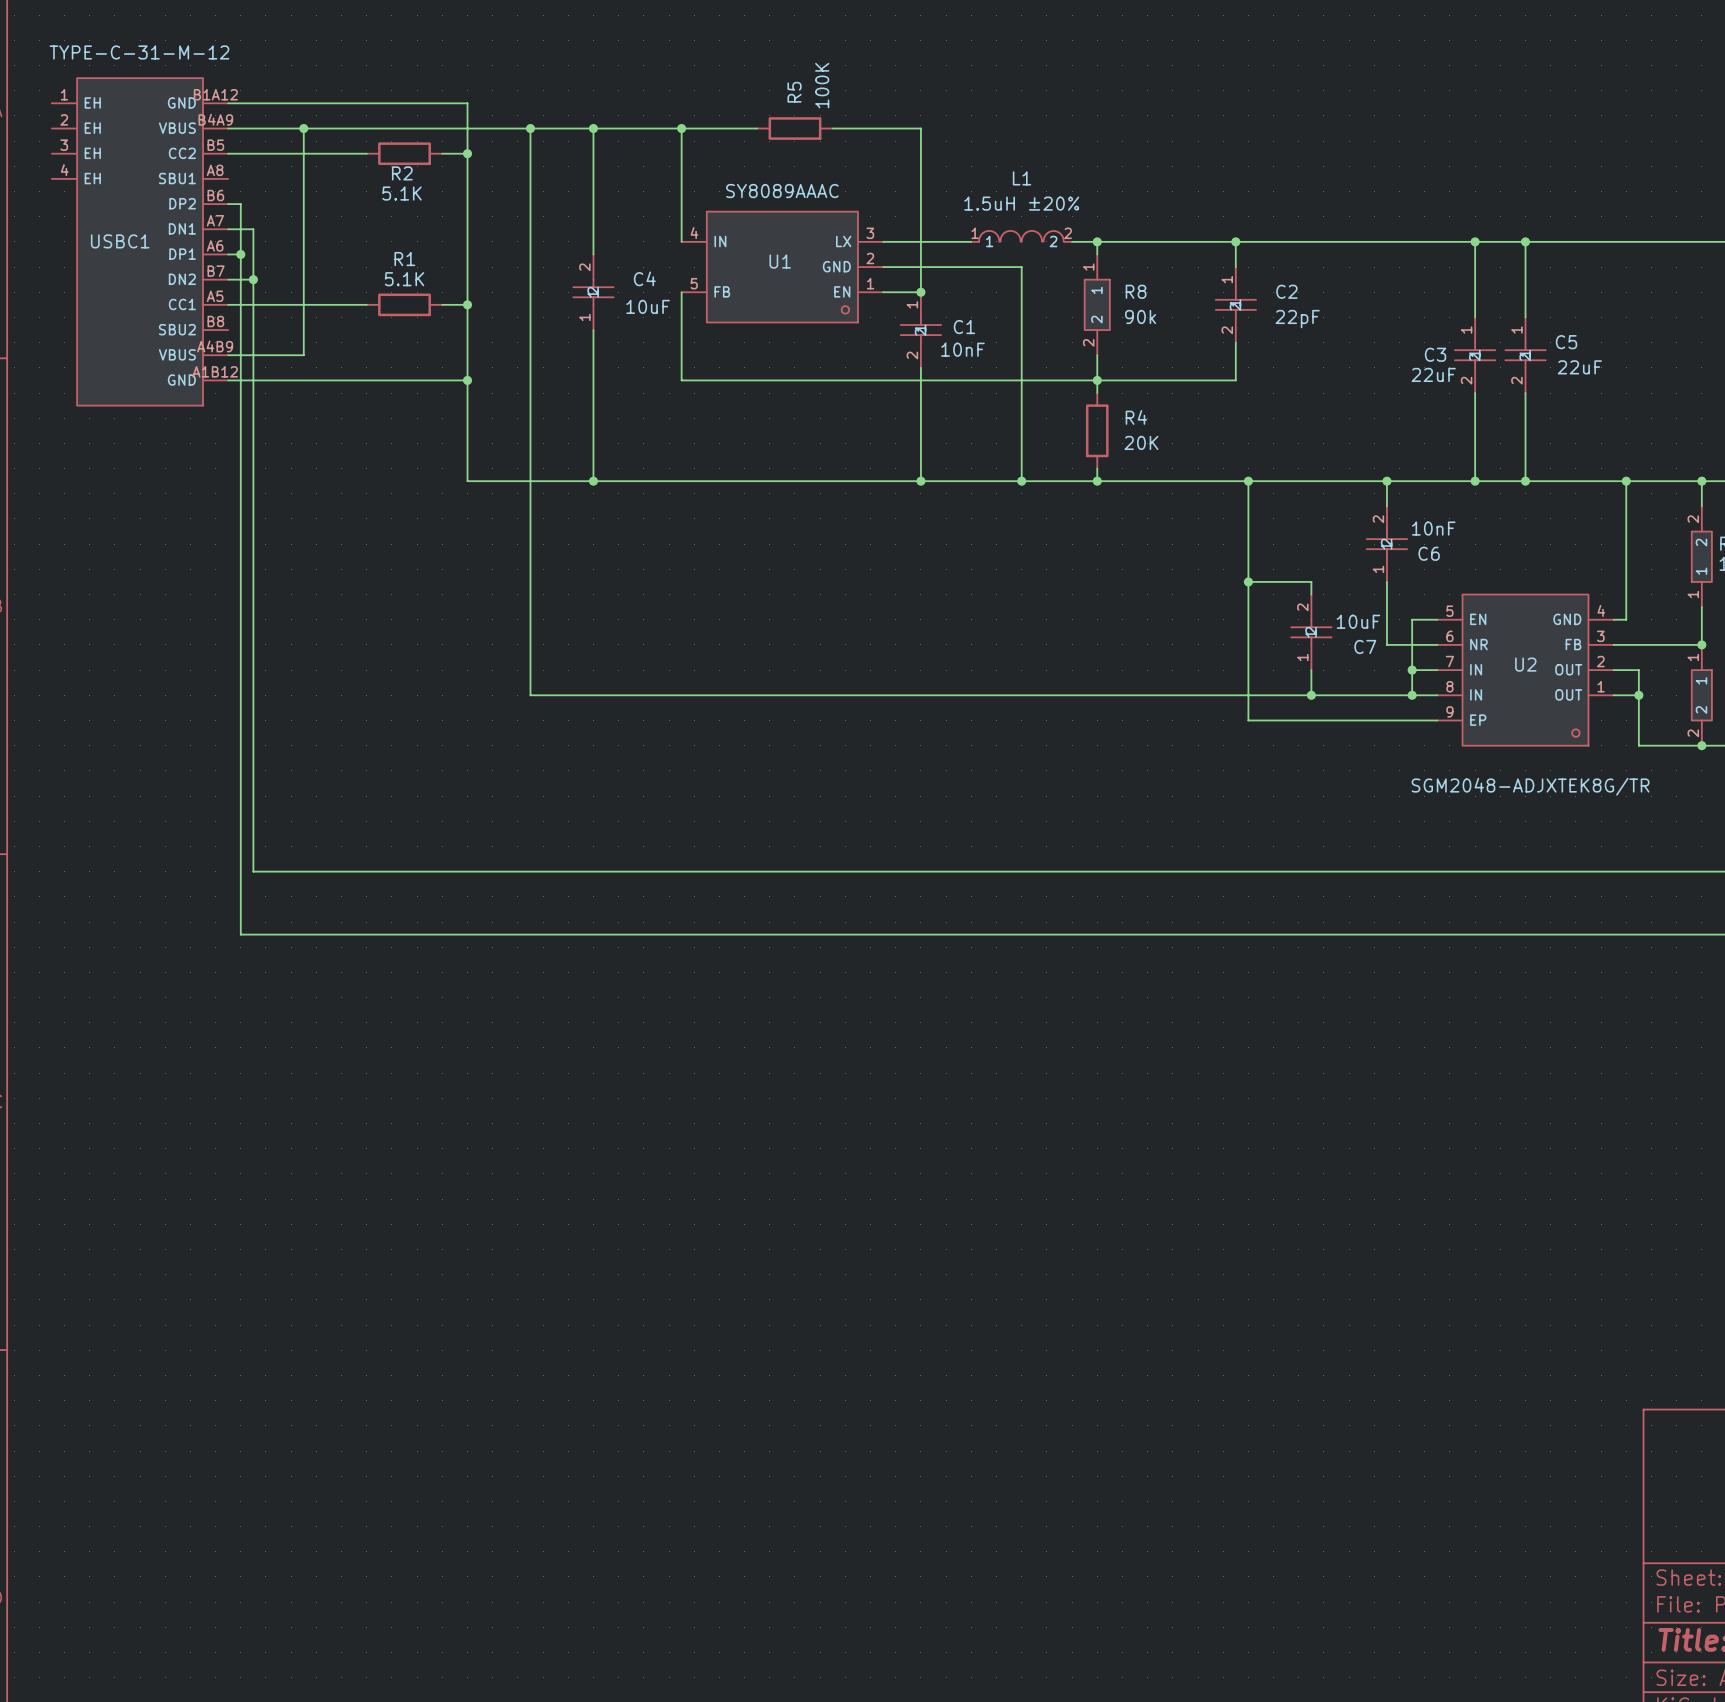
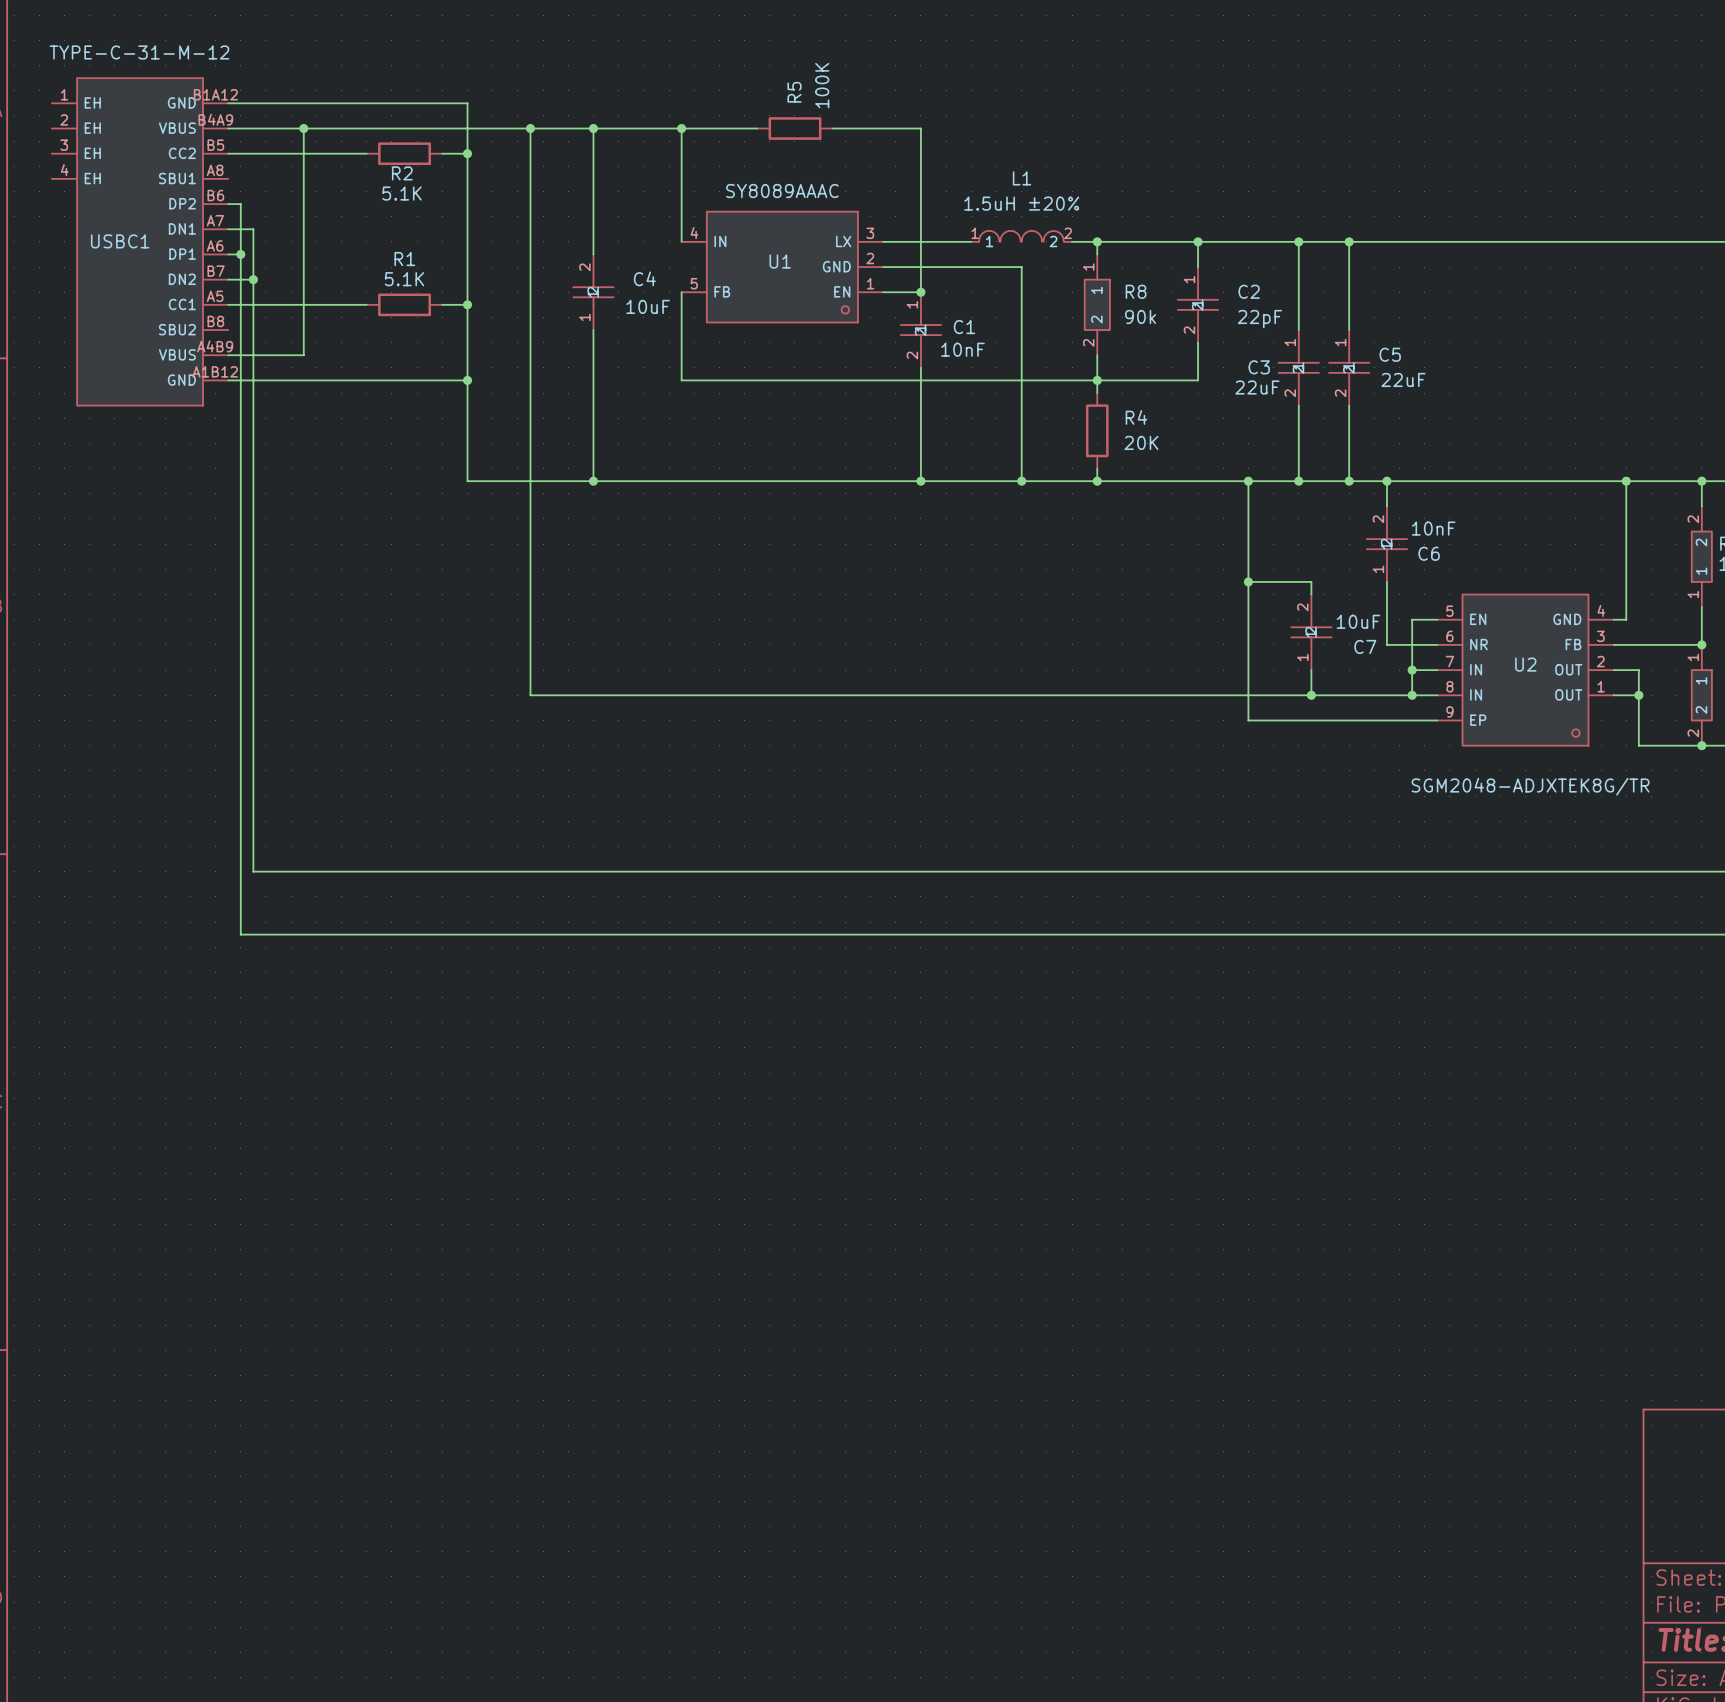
junction: none -> (1198, 241)
wire: (1235, 241) (1235, 267) -> (1198, 241) (1198, 267)
junction: (1235, 241) -> none
junction: none -> (1298, 241)
junction: none -> (1349, 241)
wire: (1475, 241) (1475, 317) -> (1298, 405) (1298, 481)
junction: (1475, 241) -> none
wire: (1525, 241) (1525, 317) -> (1349, 405) (1349, 481)
junction: (1525, 241) -> none
C2 position: (1235, 304) -> (1198, 304)
wire: (1235, 342) (1235, 380) (1198, 380) -> (1198, 342) (1198, 380)
C3 position: (1475, 355) -> (1298, 367)
C5 position: (1525, 355) -> (1349, 367)
wire: (1475, 393) (1475, 481) -> (1298, 241) (1298, 330)
wire: (1525, 393) (1525, 481) -> (1349, 241) (1349, 330)
junction: none -> (1298, 481)
junction: none -> (1349, 481)
junction: (1475, 481) -> none
junction: (1525, 481) -> none

